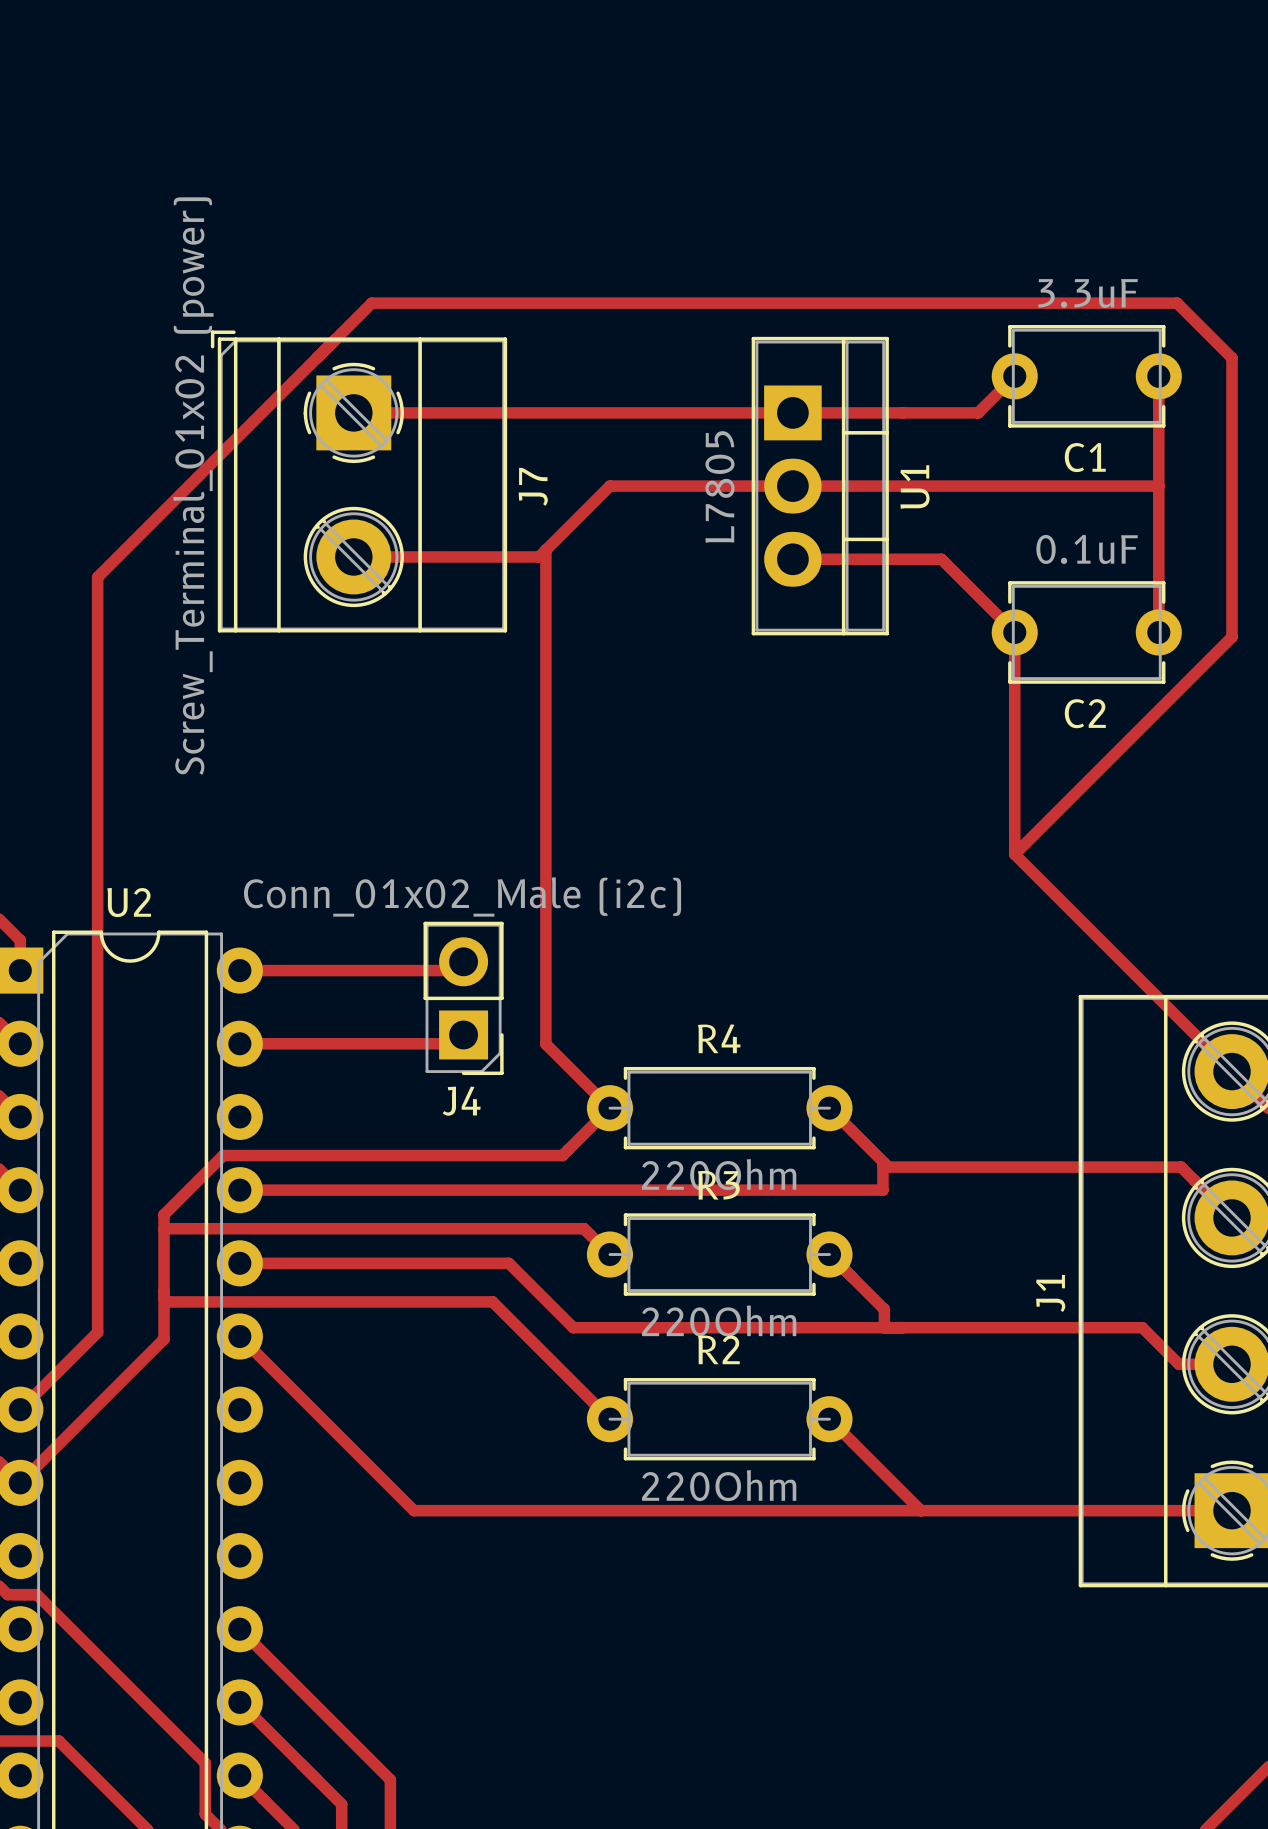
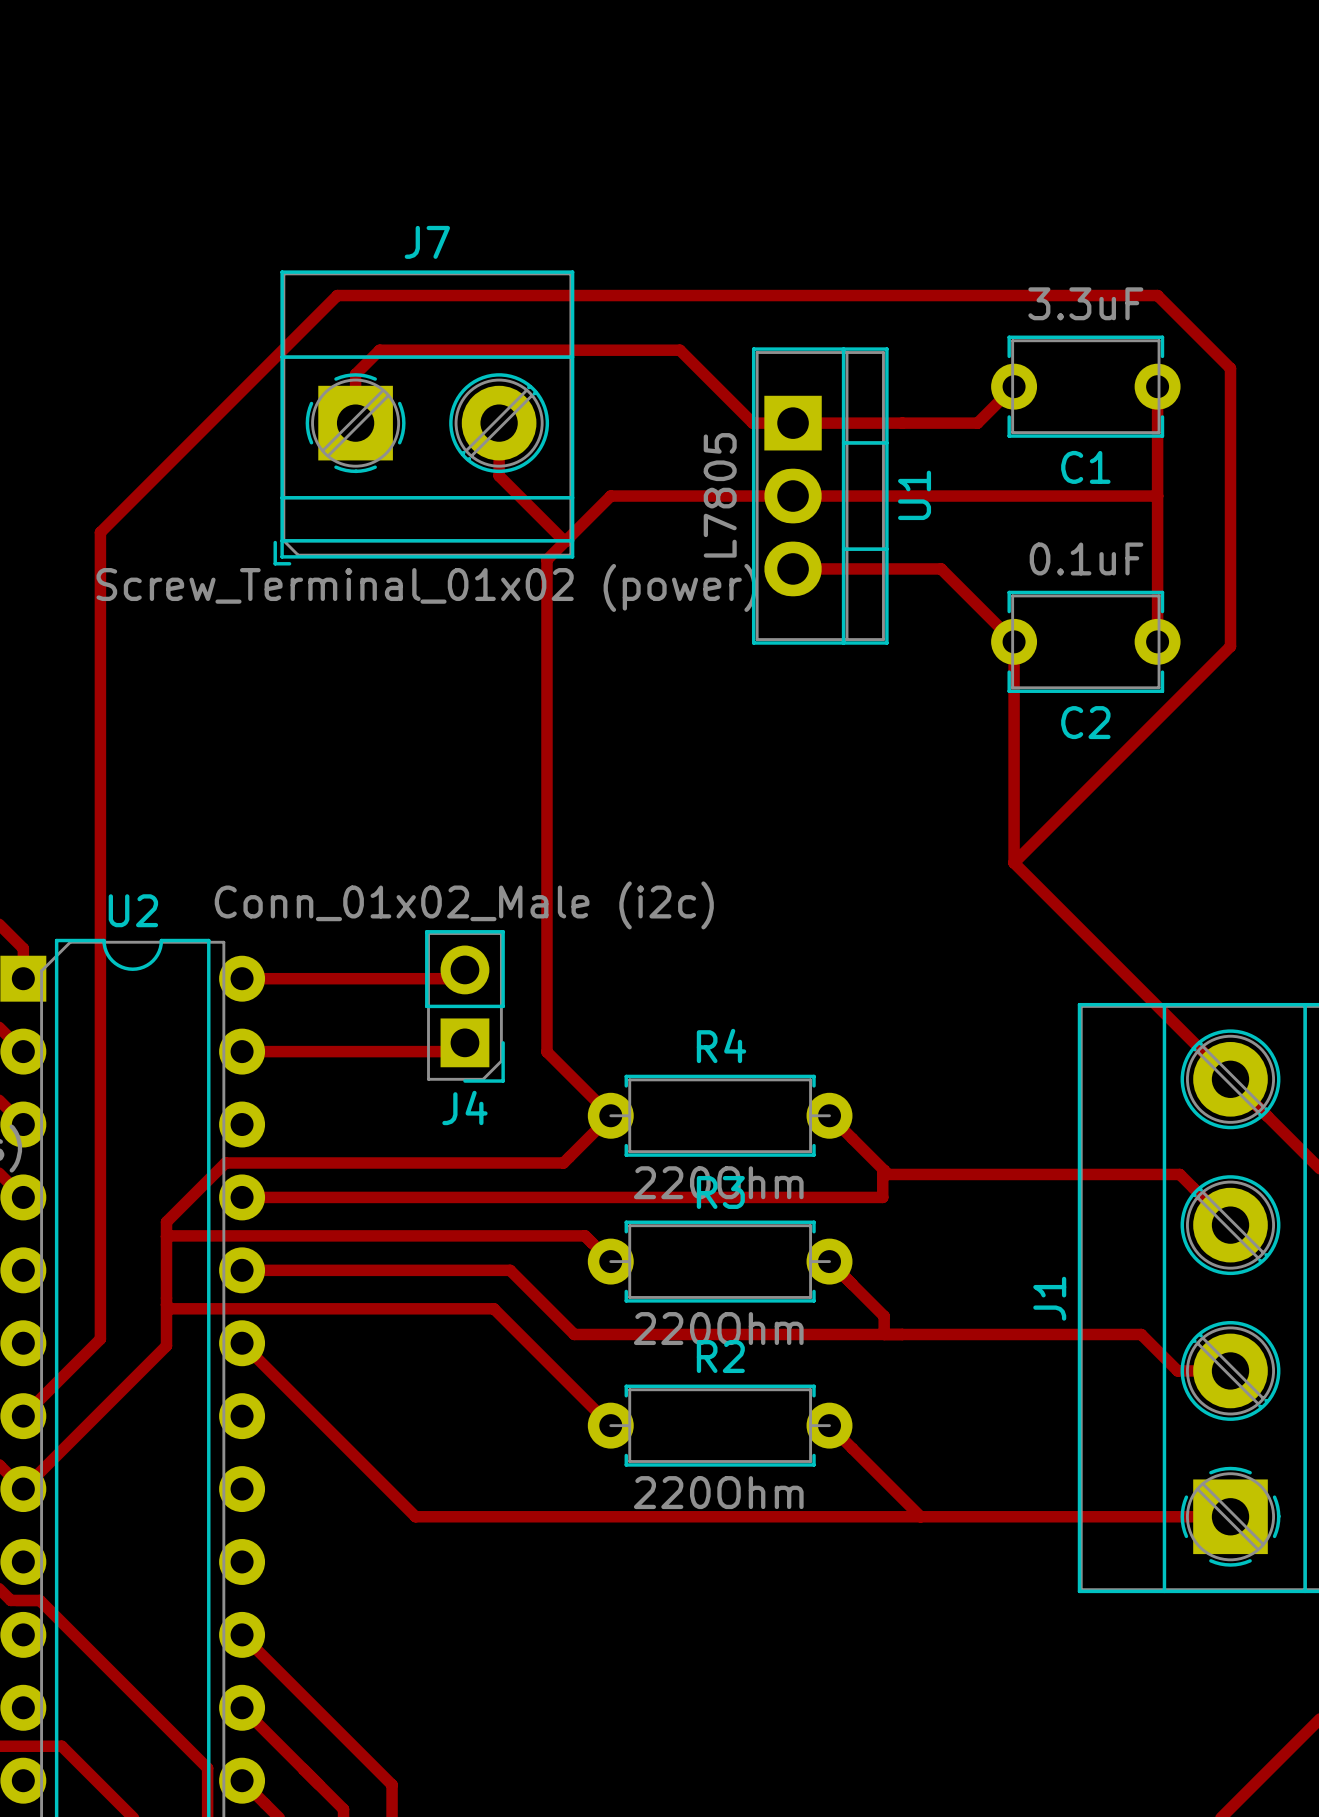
track: (1177, 303) (371, 303) (97, 577) -> (1175, 313) (1157, 295) (337, 295) (100, 532) (100, 586)
track: (353, 412) (752, 412) -> (355, 423) (355, 374) (379, 350) (679, 350) (752, 423)
track: none -> (499, 423) (499, 475) (564, 541)
J7 rotation: 0° (359, 481) -> 90° counterclockwise (423, 417)
track: (545, 550) (539, 556) (353, 556) -> none

